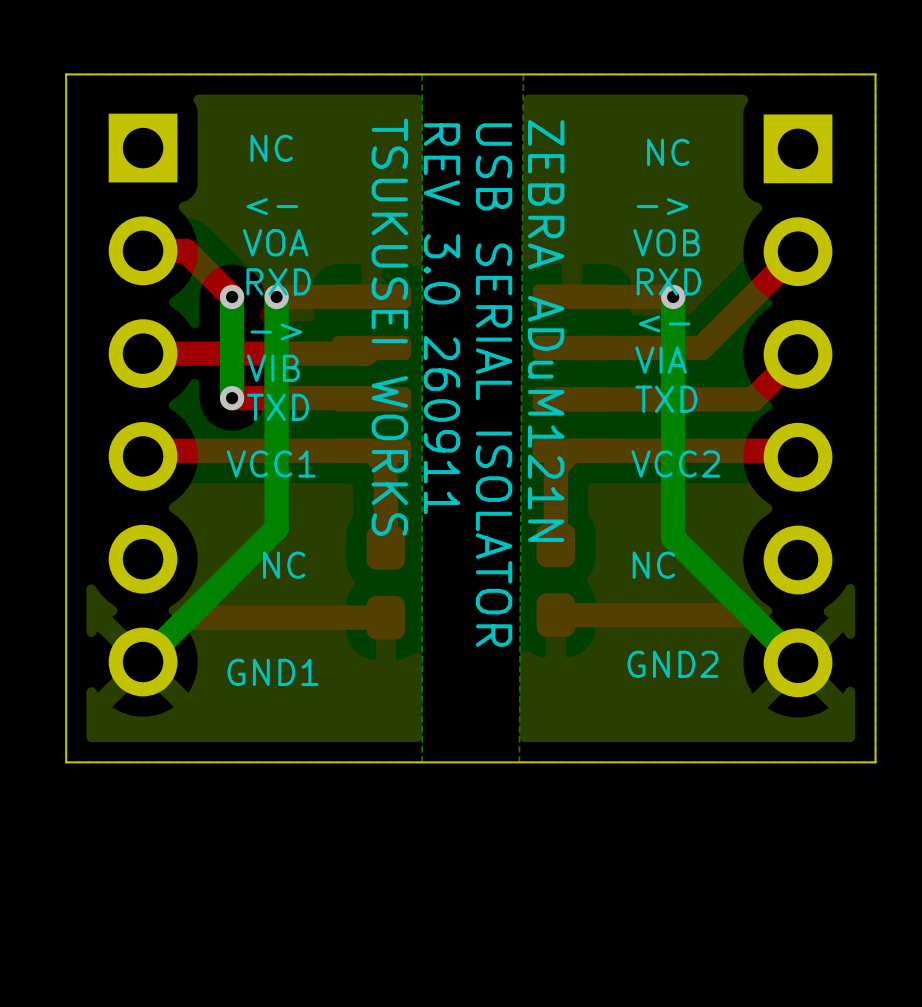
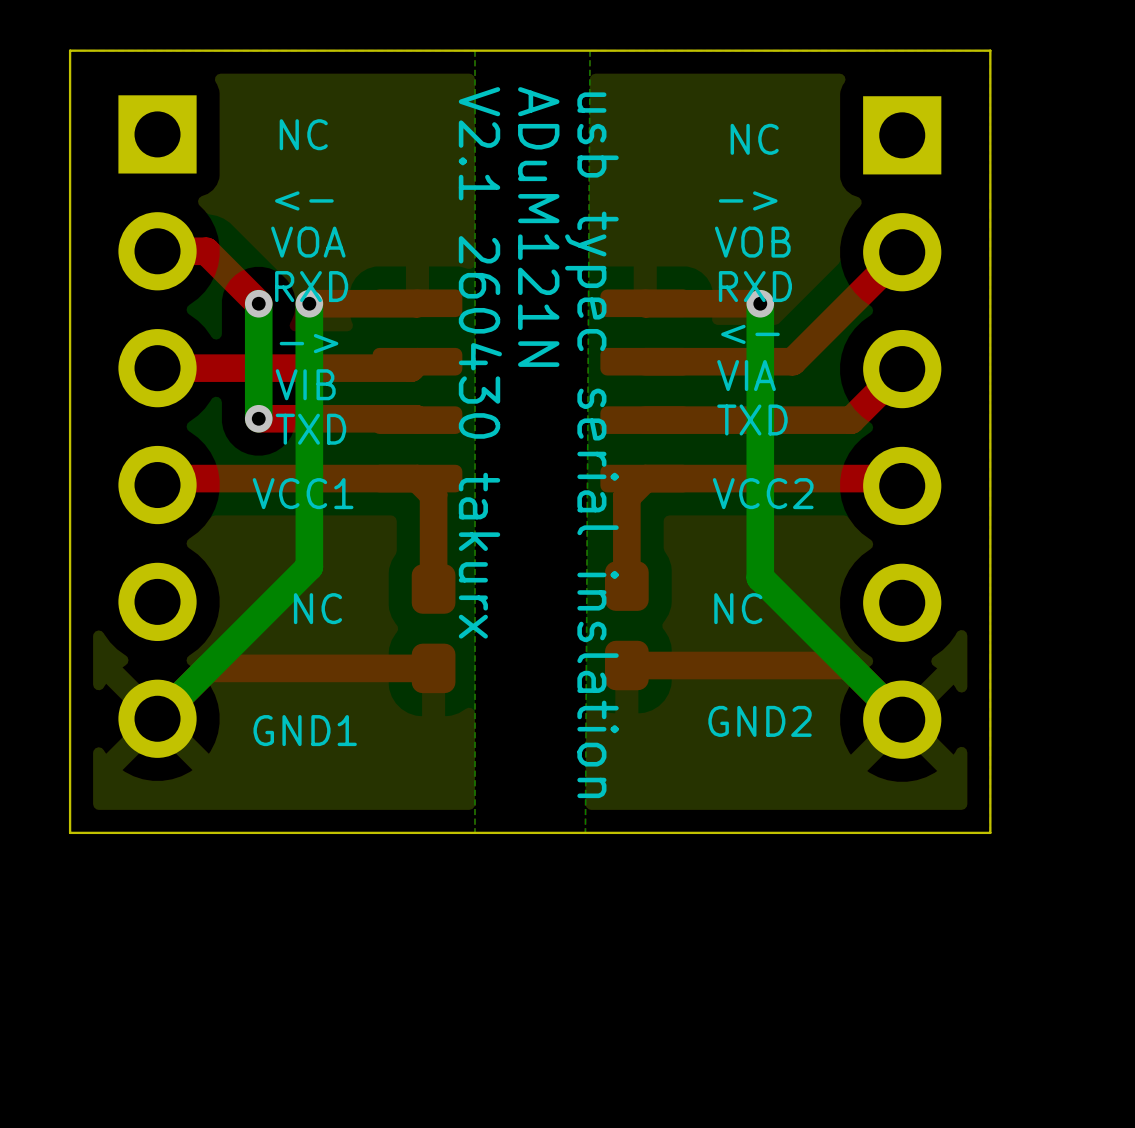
text: REV 3.0 260911 (441, 318) -> none
text: TSUKUSEI WORKS (389, 327) -> none
text: ZEBRA ADuM121N (546, 331) -> ADuM121N (538, 227)
text: none -> V2.1 260430 takurx (480, 362)
text: USB SERIAL ISOLATOR (494, 385) -> none
text: none -> usb typec serial inslation (591, 445)

